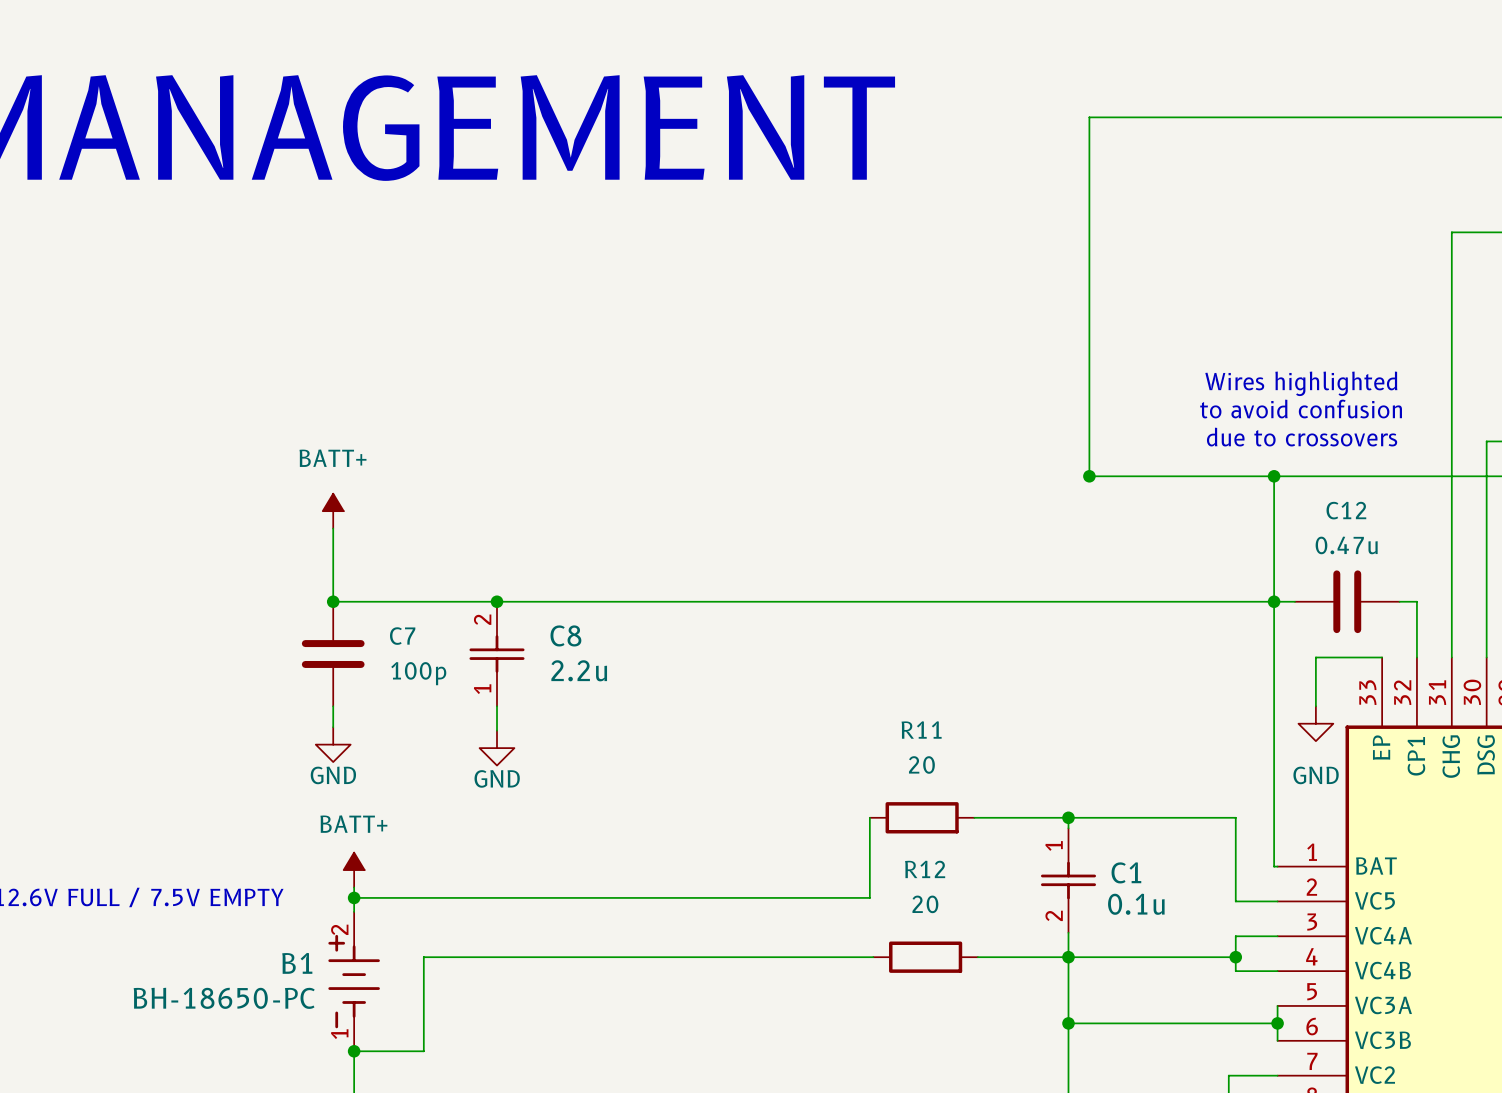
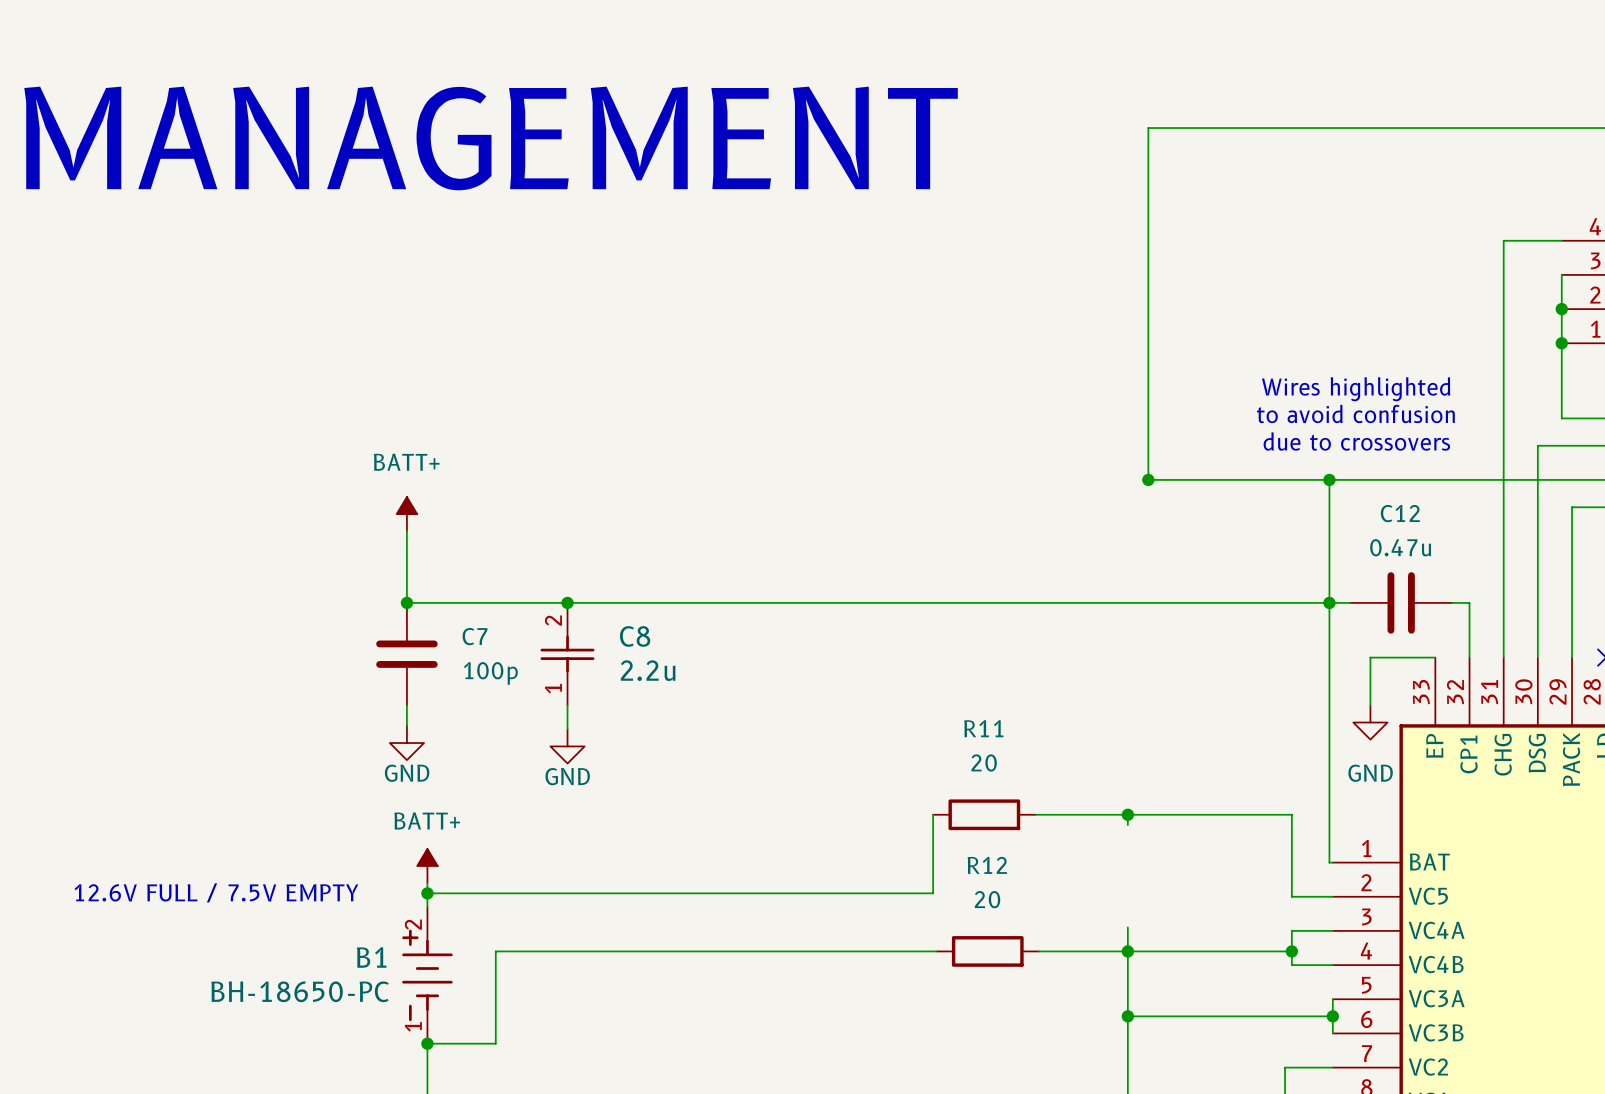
C1: 0.1u (1068, 880) -> none

